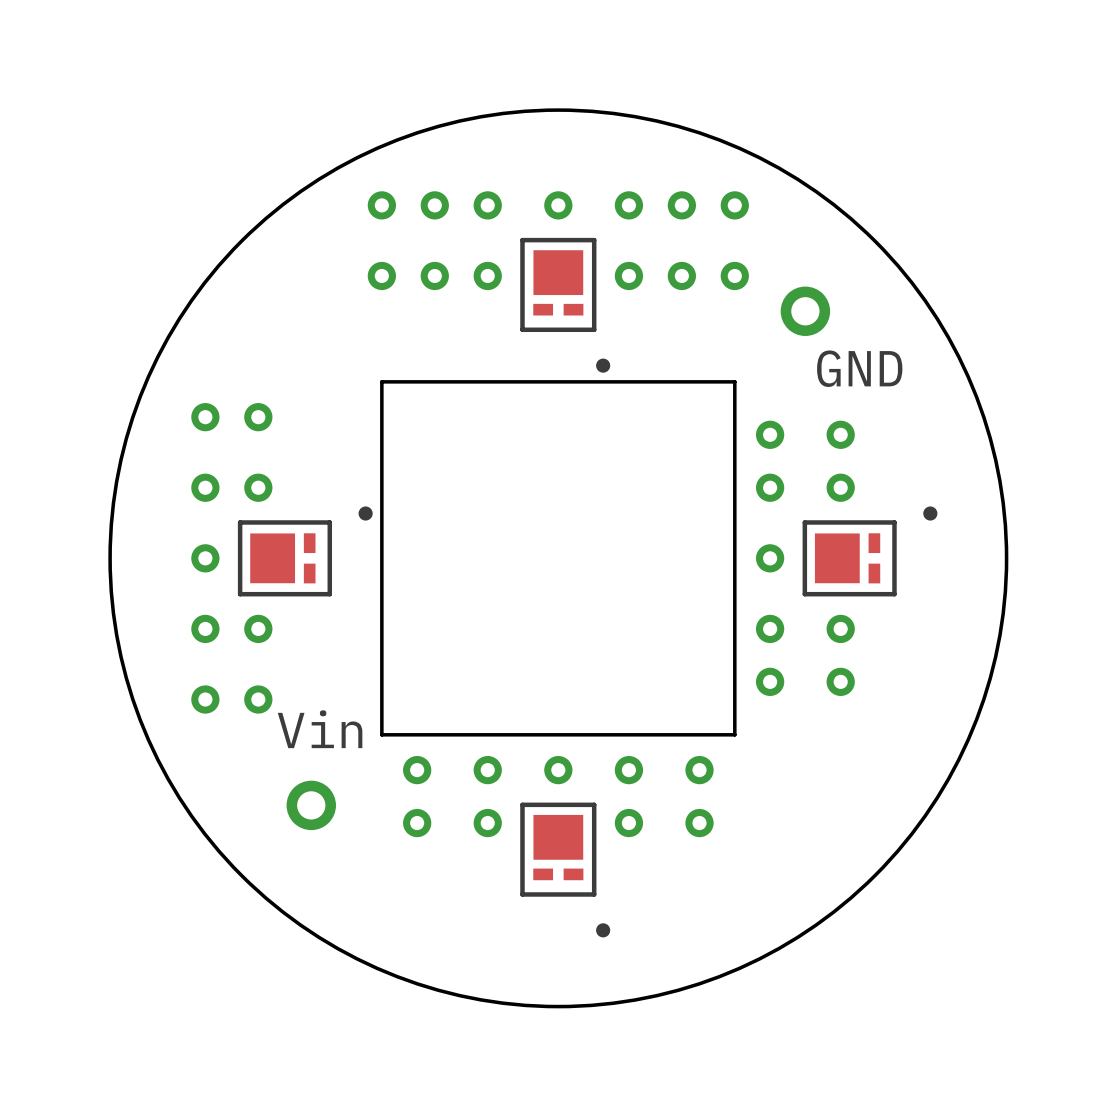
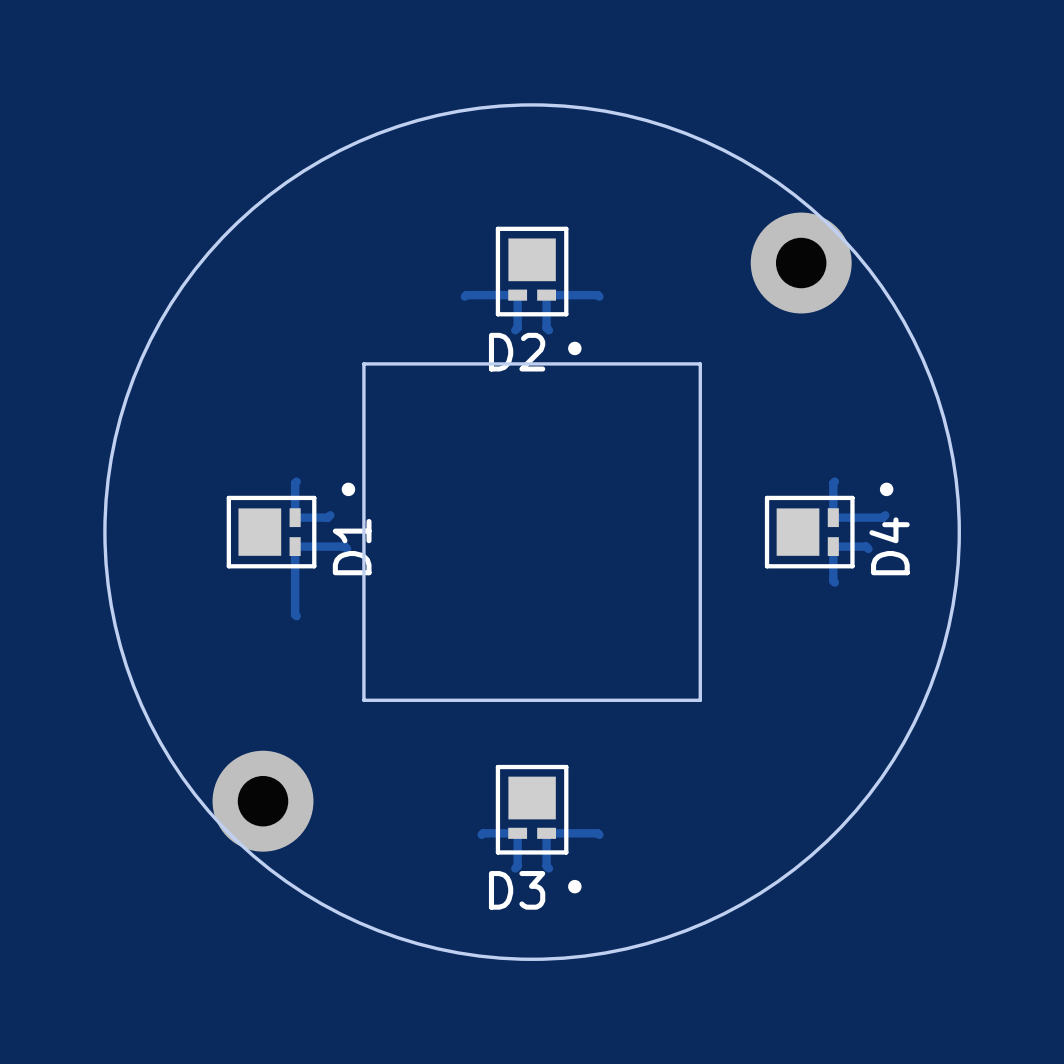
via: (381, 205) -> none
via: (434, 205) -> none
via: (487, 205) -> none
via: (558, 205) -> none
via: (628, 205) -> none
via: (681, 205) -> none
via: (734, 205) -> none
via: (381, 275) -> none
via: (434, 275) -> none
via: (487, 275) -> none
via: (628, 275) -> none
via: (681, 275) -> none
via: (734, 275) -> none
via: none -> (801, 263)
track: none -> (464, 296) (517, 295) (517, 327) (515, 330)
track: none -> (599, 296) (546, 295) (546, 327) (548, 330)
part: (805, 311) -> none
text: GND (859, 368) -> none
D2 name: none -> D2 (517, 352)
via: (205, 417) -> none
via: (258, 417) -> none
via: (770, 434) -> none
via: (840, 434) -> none
via: (205, 487) -> none
via: (258, 487) -> none
via: (770, 487) -> none
via: (840, 487) -> none
track: none -> (296, 481) (295, 517) (327, 517) (330, 515)
track: none -> (834, 481) (833, 517) (882, 517) (885, 515)
via: (205, 558) -> none
via: (770, 558) -> none
D1 name: none -> D1 (352, 547)
D4 name: none -> D4 (889, 546)
track: none -> (347, 548) (344, 546) (295, 546) (296, 616)
track: none -> (868, 548) (866, 546) (833, 546) (834, 582)
via: (205, 628) -> none
via: (258, 628) -> none
via: (770, 628) -> none
via: (840, 628) -> none
via: (770, 681) -> none
via: (840, 681) -> none
via: (205, 699) -> none
via: (258, 699) -> none
text: Vin (320, 729) -> none
via: (417, 770) -> none
via: (487, 770) -> none
via: (558, 770) -> none
via: (628, 770) -> none
via: (699, 770) -> none
part: (311, 805) -> none
via: (417, 823) -> none
via: (487, 823) -> none
via: (628, 823) -> none
via: (699, 823) -> none
via: none -> (263, 801)
track: none -> (481, 834) (517, 833) (517, 866) (515, 868)
track: none -> (599, 834) (546, 833) (546, 866) (548, 868)
D3 name: none -> D3 (517, 890)

